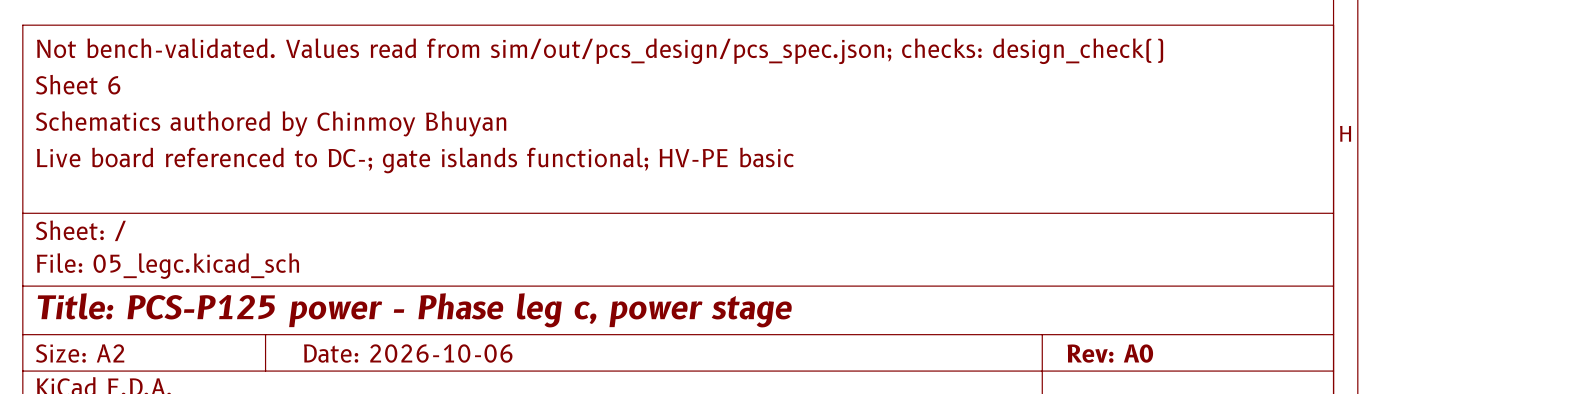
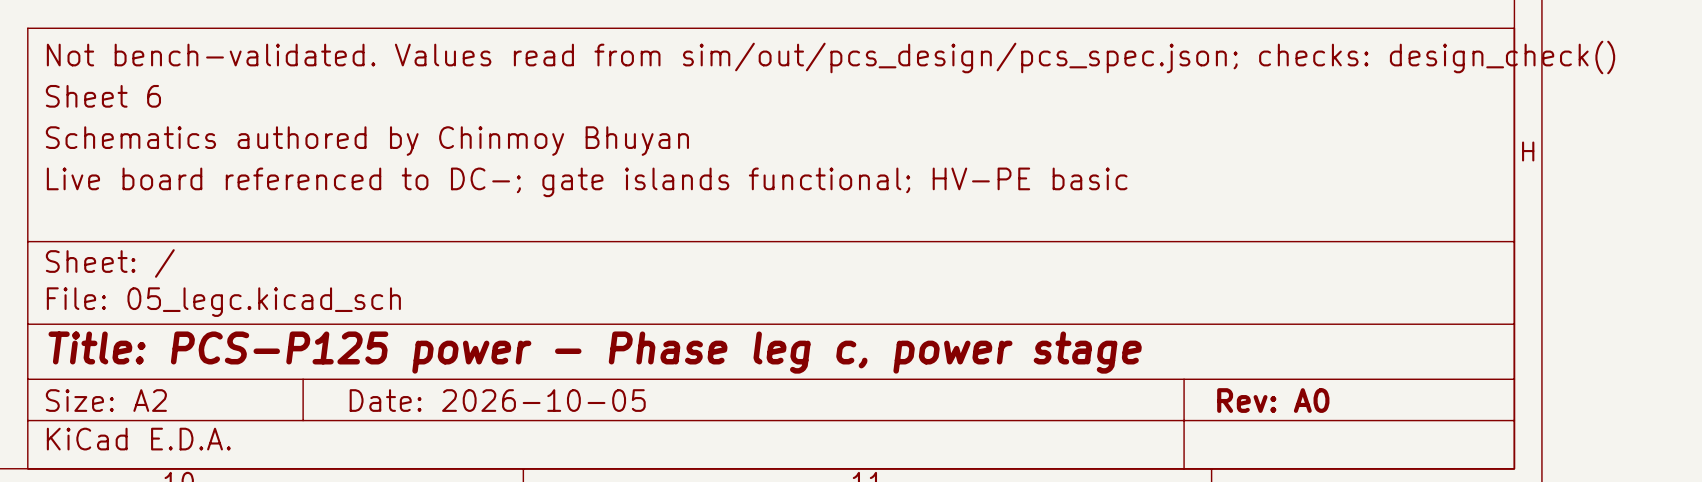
title block: Date: 2026-10-06 (408, 353) -> Date: 2026-10-05 (497, 400)

